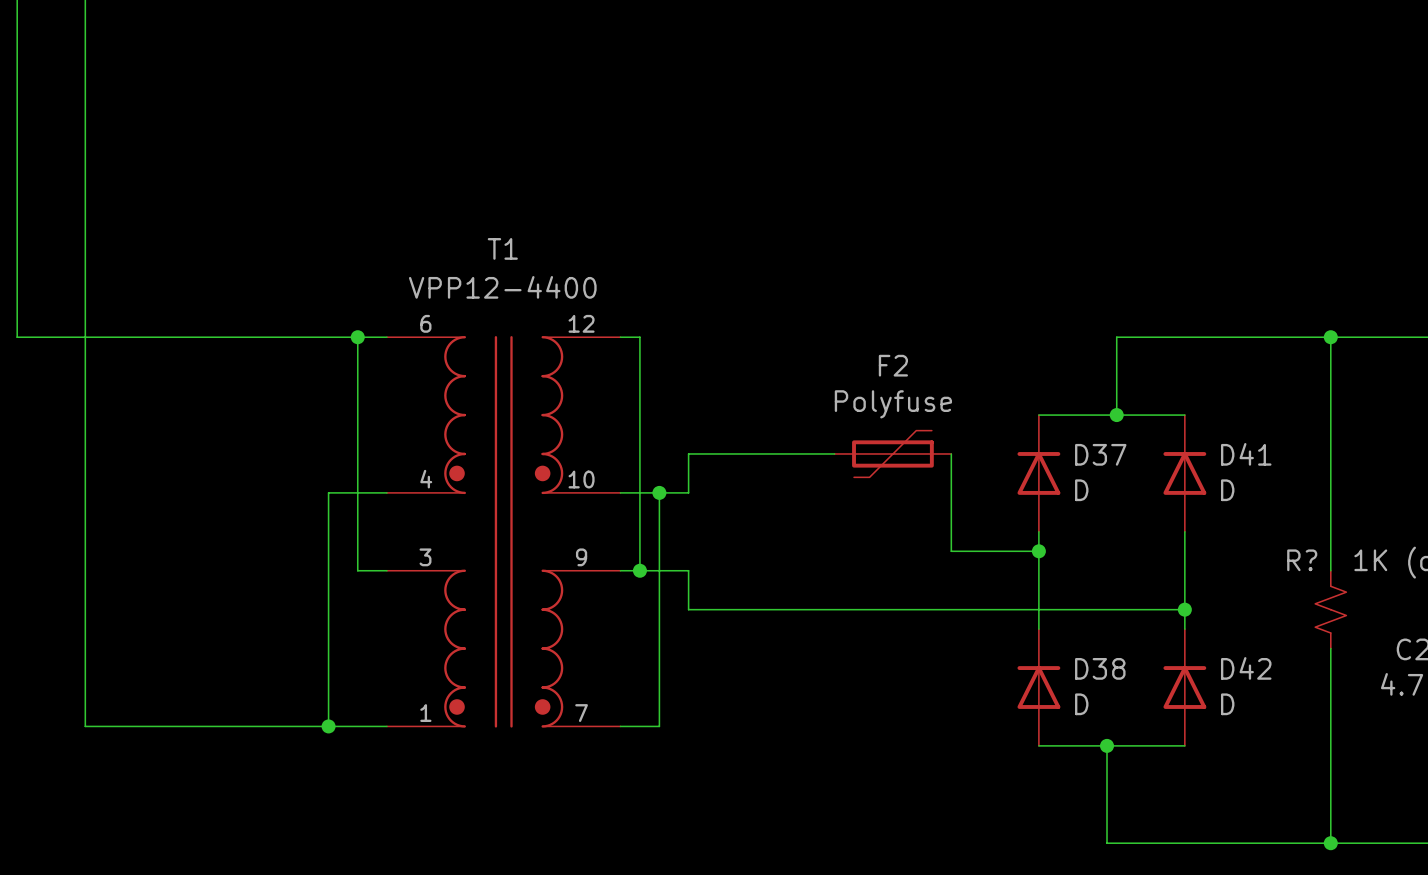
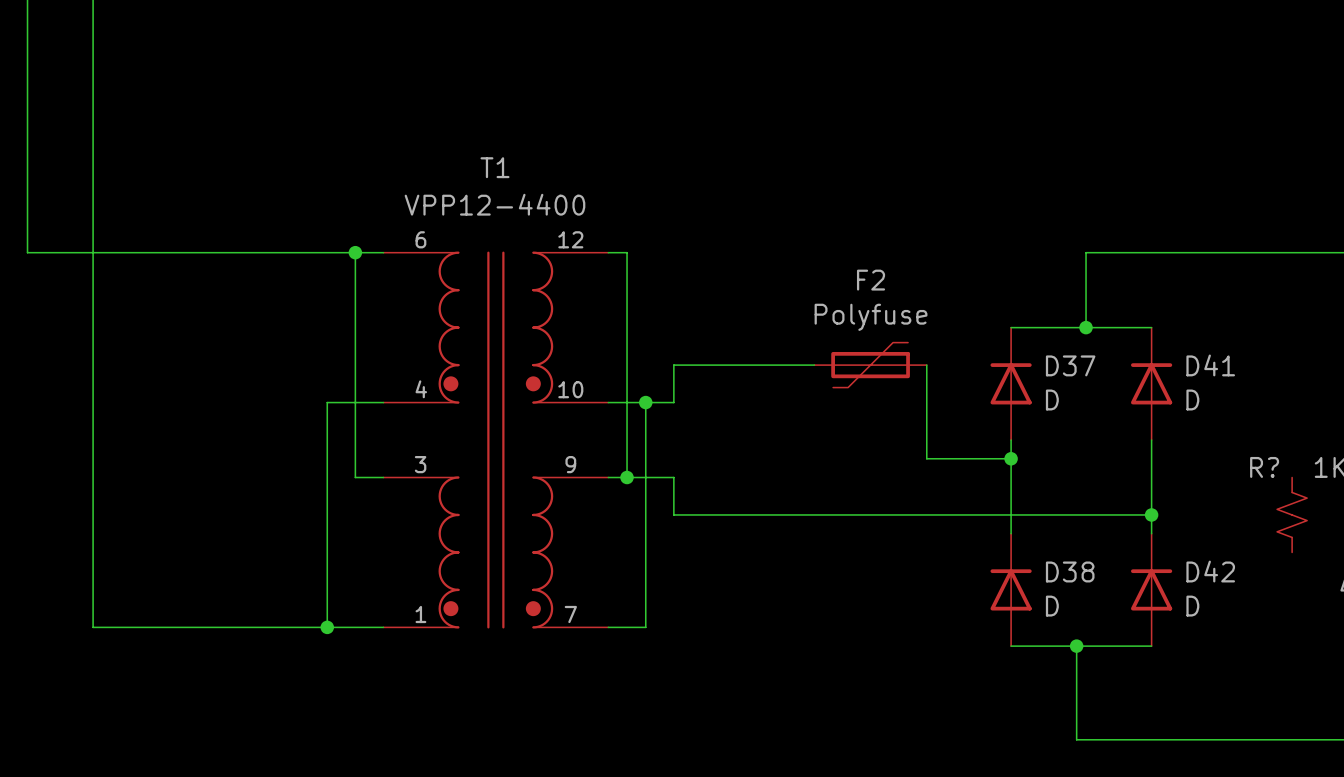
wire: (1330, 337) (1330, 570) -> none
junction: (1330, 337) -> none
wire: (1330, 648) (1330, 843) -> none
junction: (1330, 843) -> none

